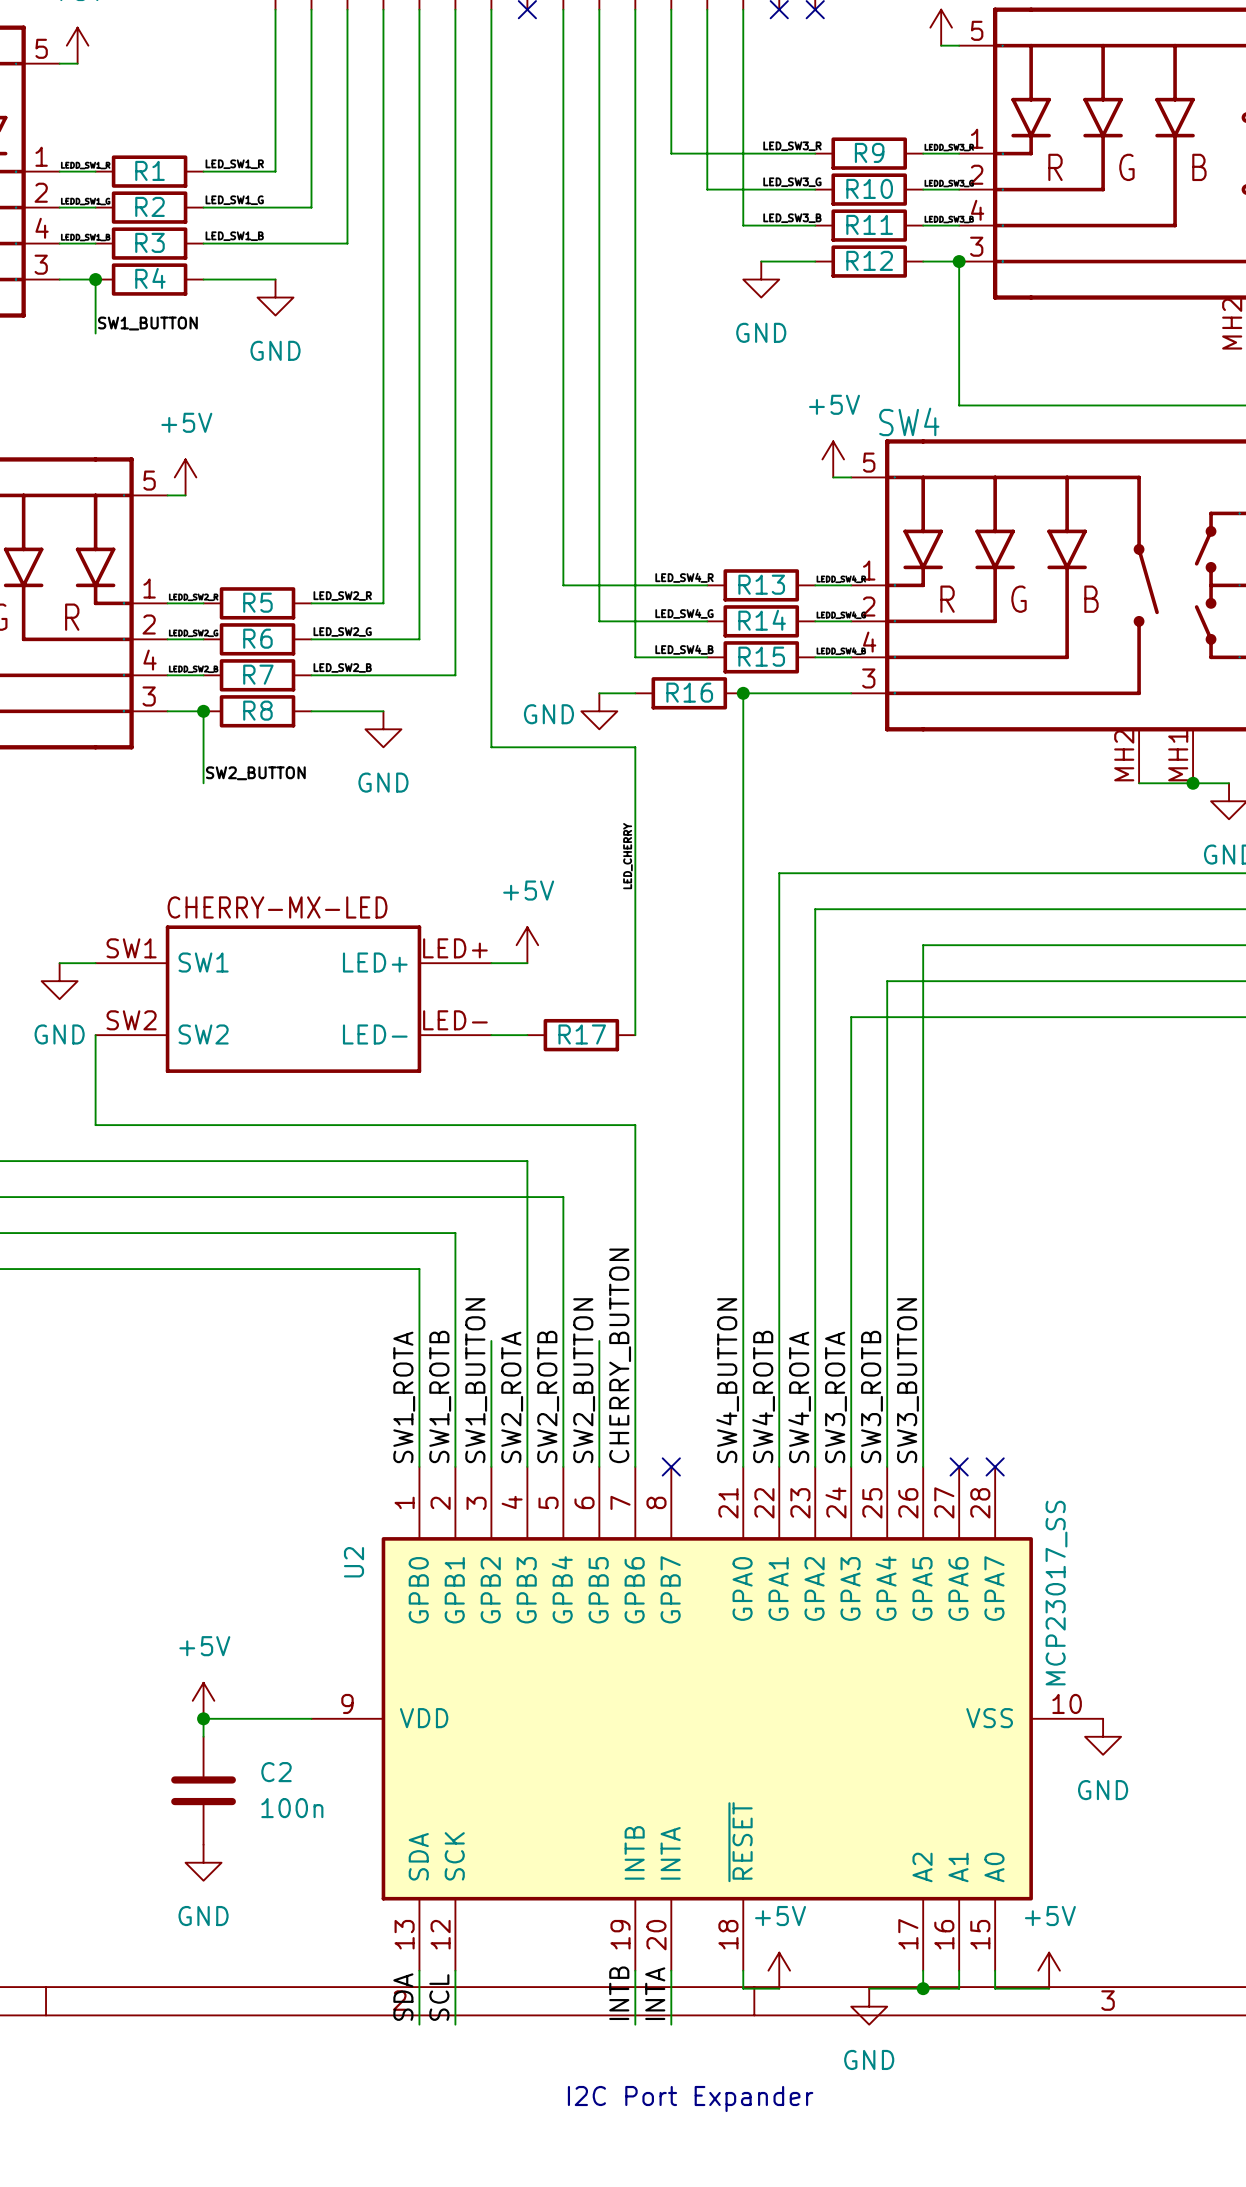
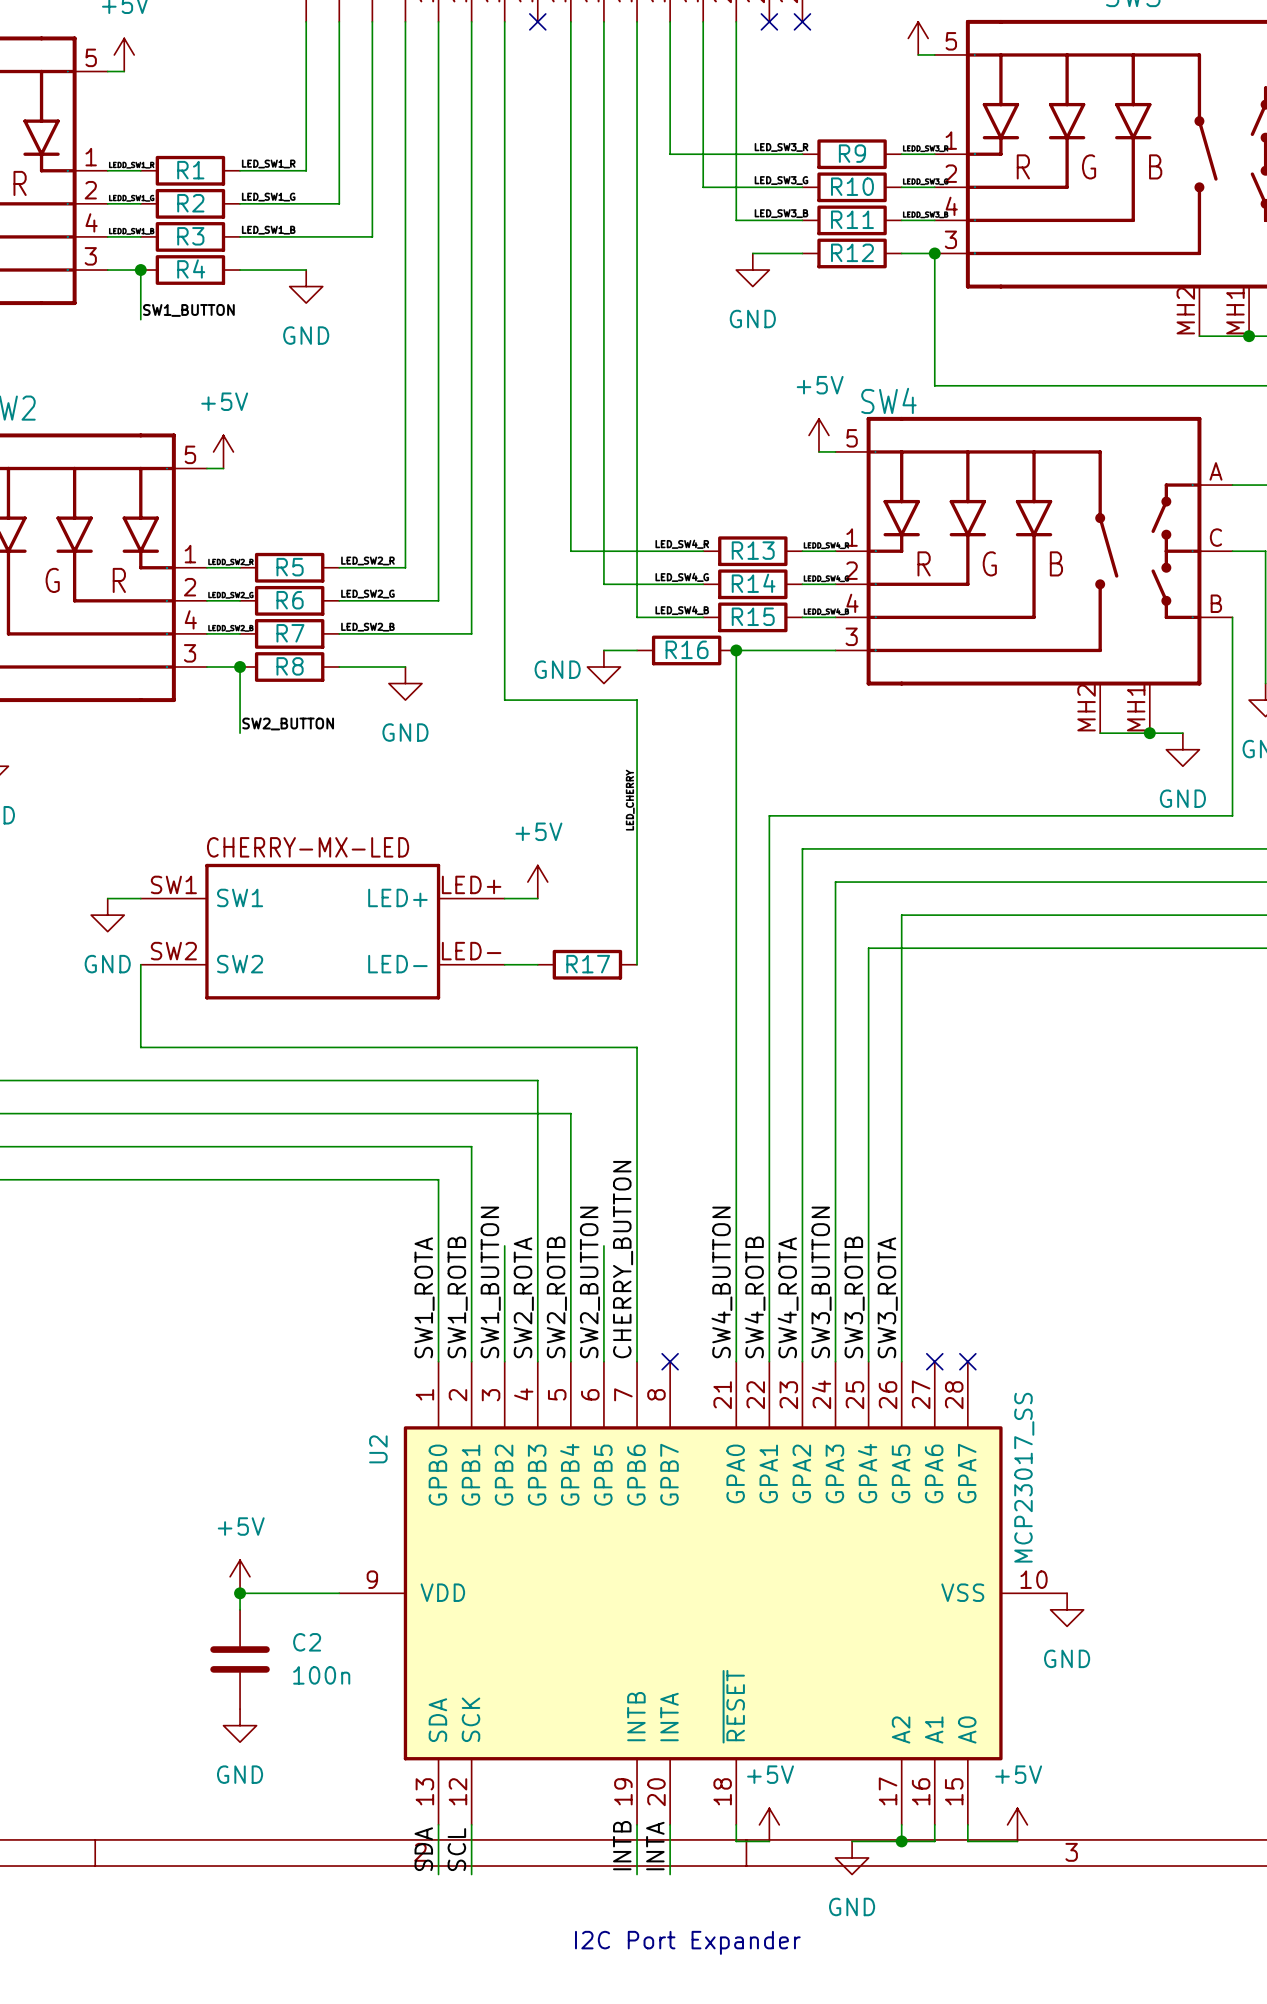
wire: (923, 945) (923, 981) (887, 981) (887, 1017) (851, 1017) -> (901, 882) (835, 882) (835, 948)
label: SW3_BUTTON (907, 1380) -> SW3_ROTA (887, 1297)
label: SW3_ROTA (836, 1397) -> SW3_BUTTON (821, 1282)

